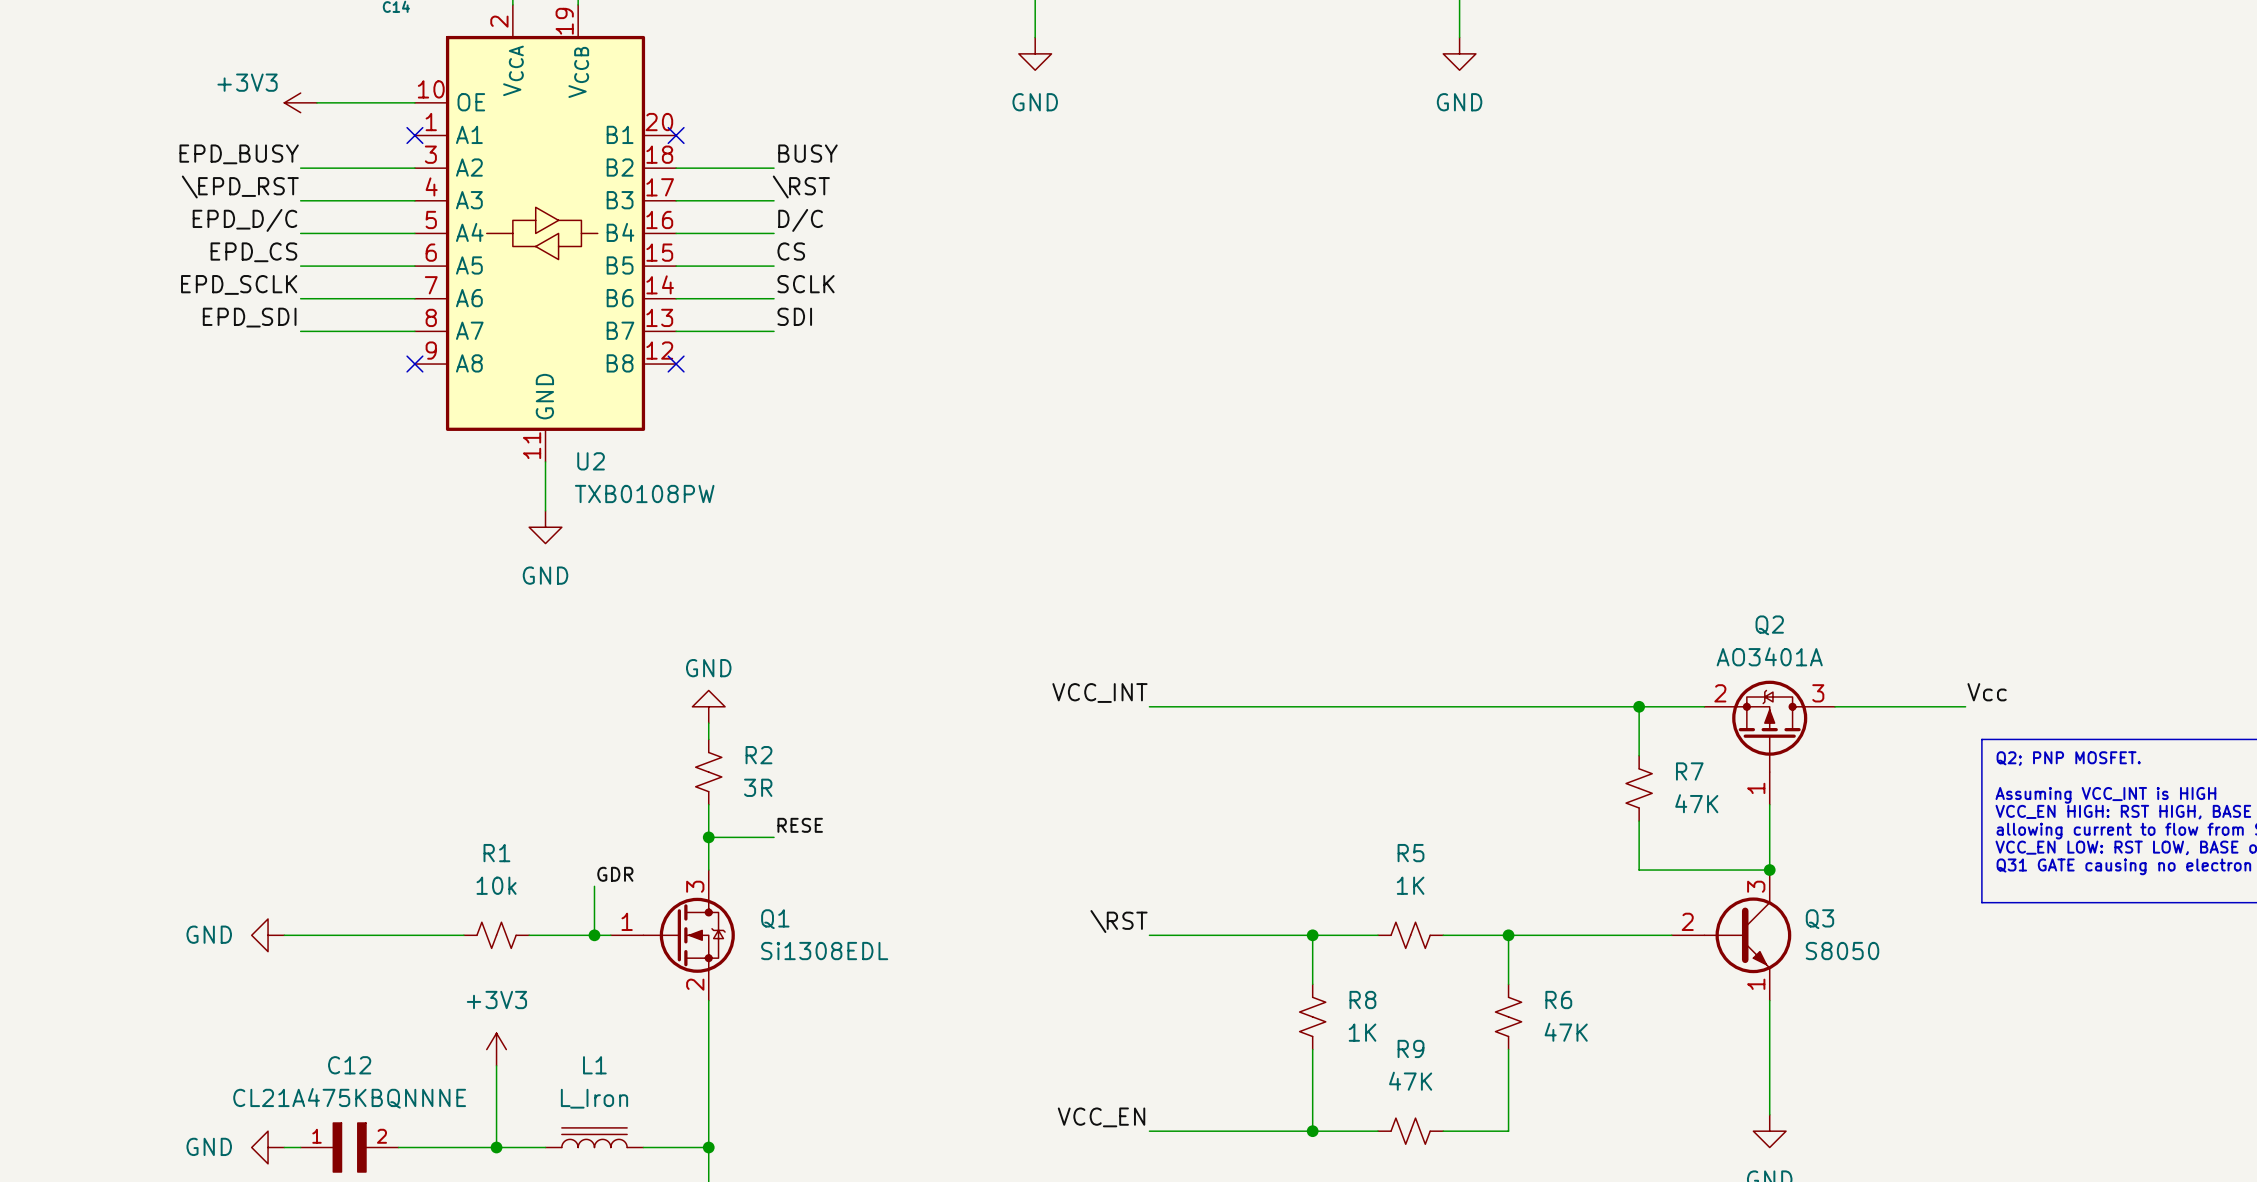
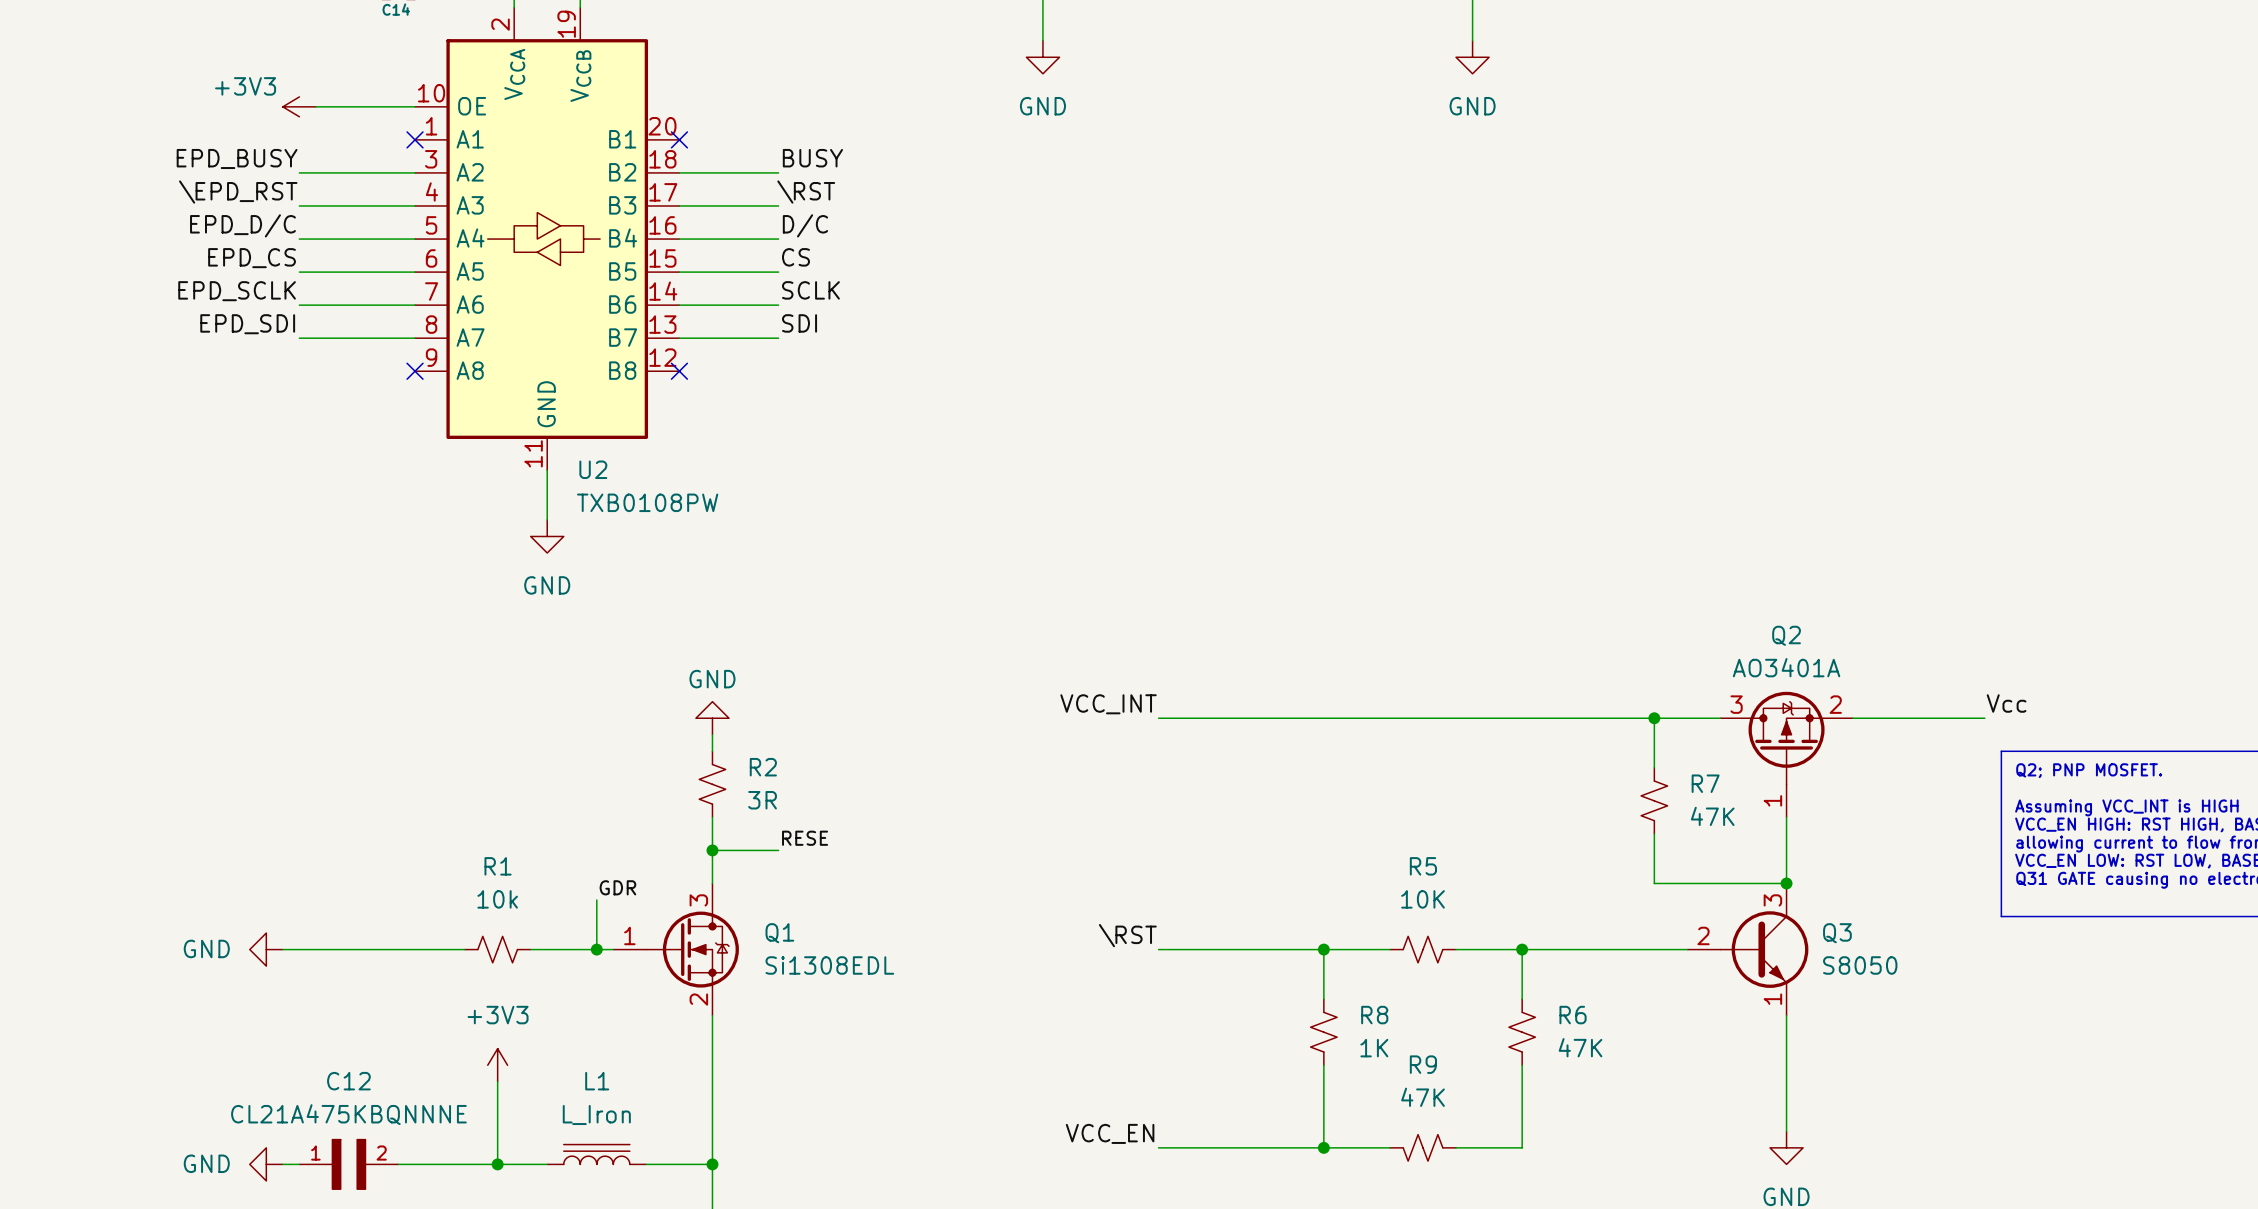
Q2 flip: as is (1769, 726) -> left-right (1786, 738)
R5 value: 1K (1410, 885) -> 10K (1423, 899)
R9 flip: as is (1410, 1131) -> left-right (1423, 1147)

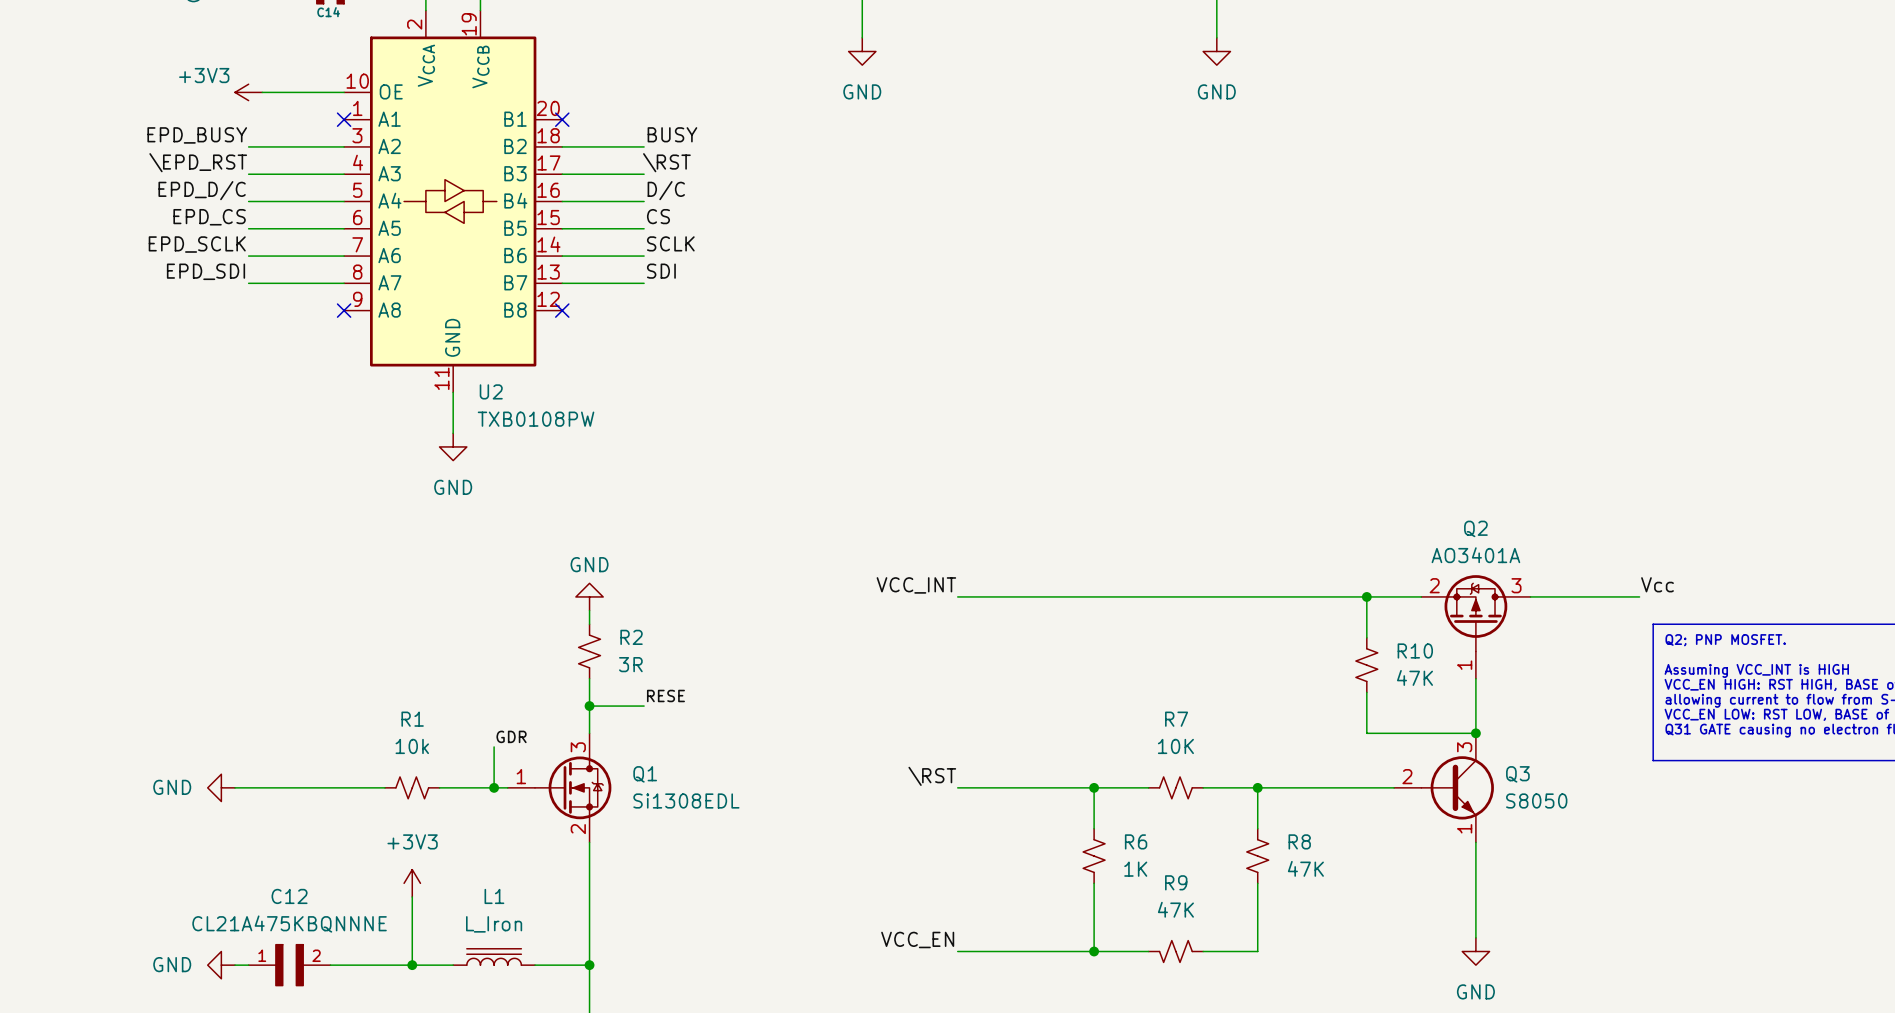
Q2 flip: as is (1786, 738) -> left-right (1475, 613)
R7 name: R7 (1705, 783) -> R10 (1415, 650)
R5 name: R5 (1423, 866) -> R7 (1176, 719)
R8 name: R8 (1374, 1015) -> R6 (1136, 841)
R6 name: R6 (1573, 1015) -> R8 (1299, 841)

